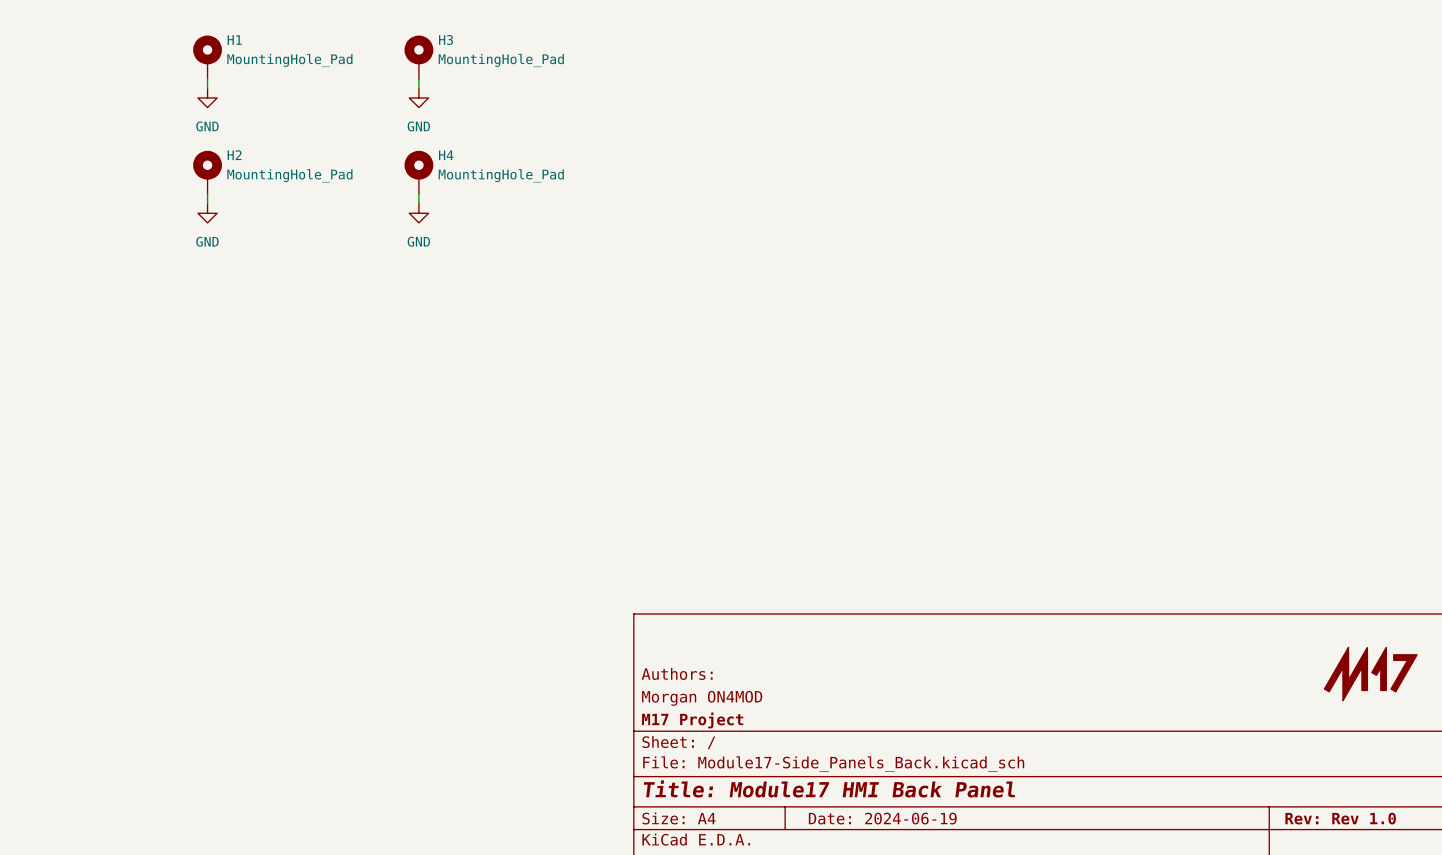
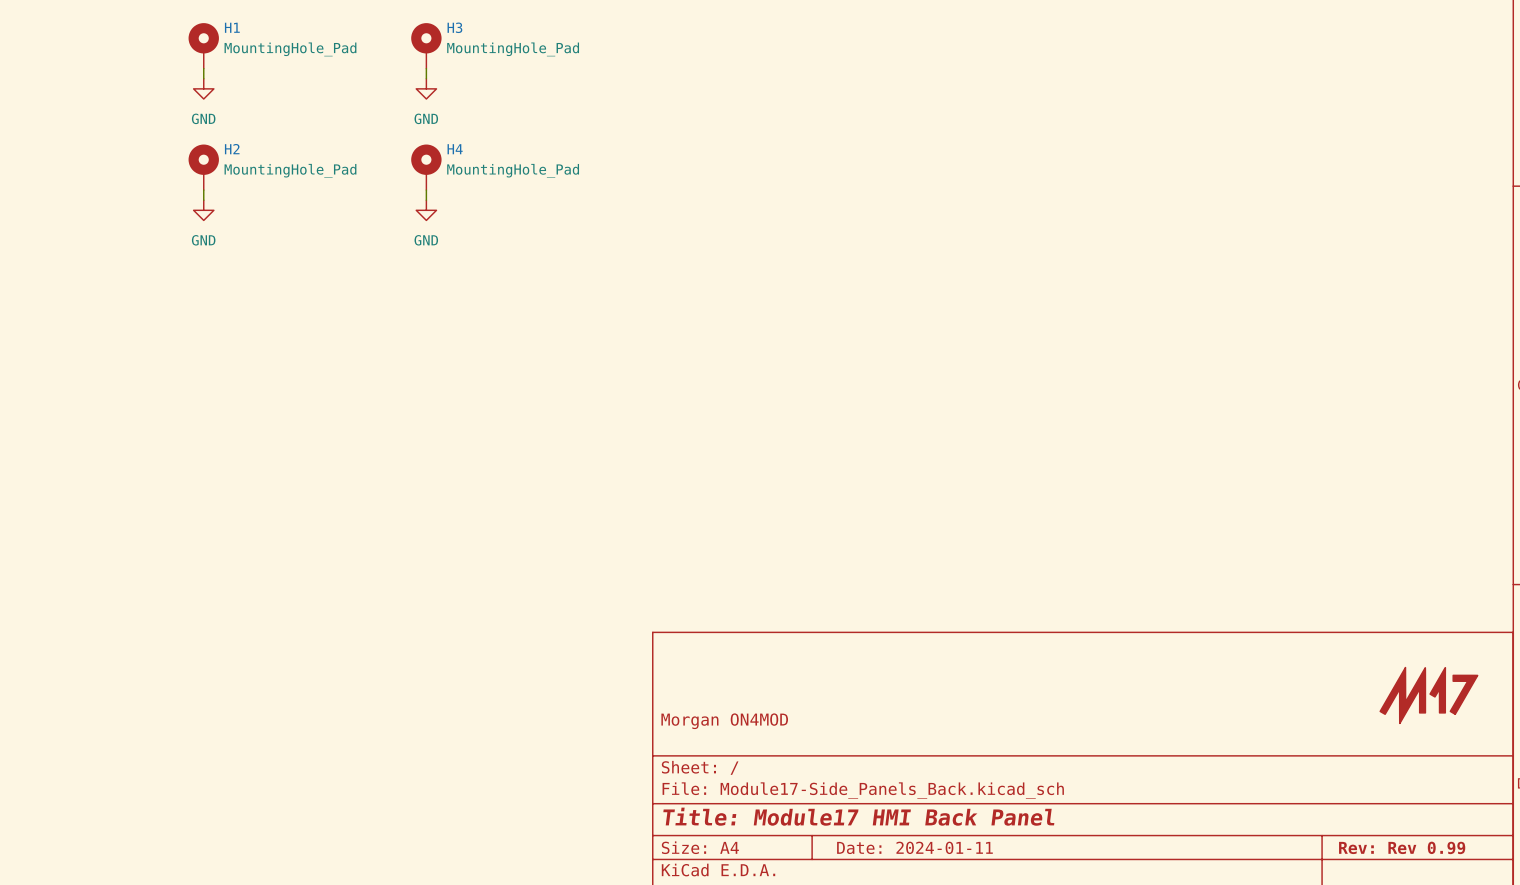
title block: Authors: (677, 673) -> none
title block: M17 Project (692, 720) -> none
title block: Date: 2024-06-19 (882, 818) -> Date: 2024-01-11 (914, 847)
title block: Rev: Rev 1.0 (1340, 818) -> Rev: Rev 0.99 (1402, 847)

